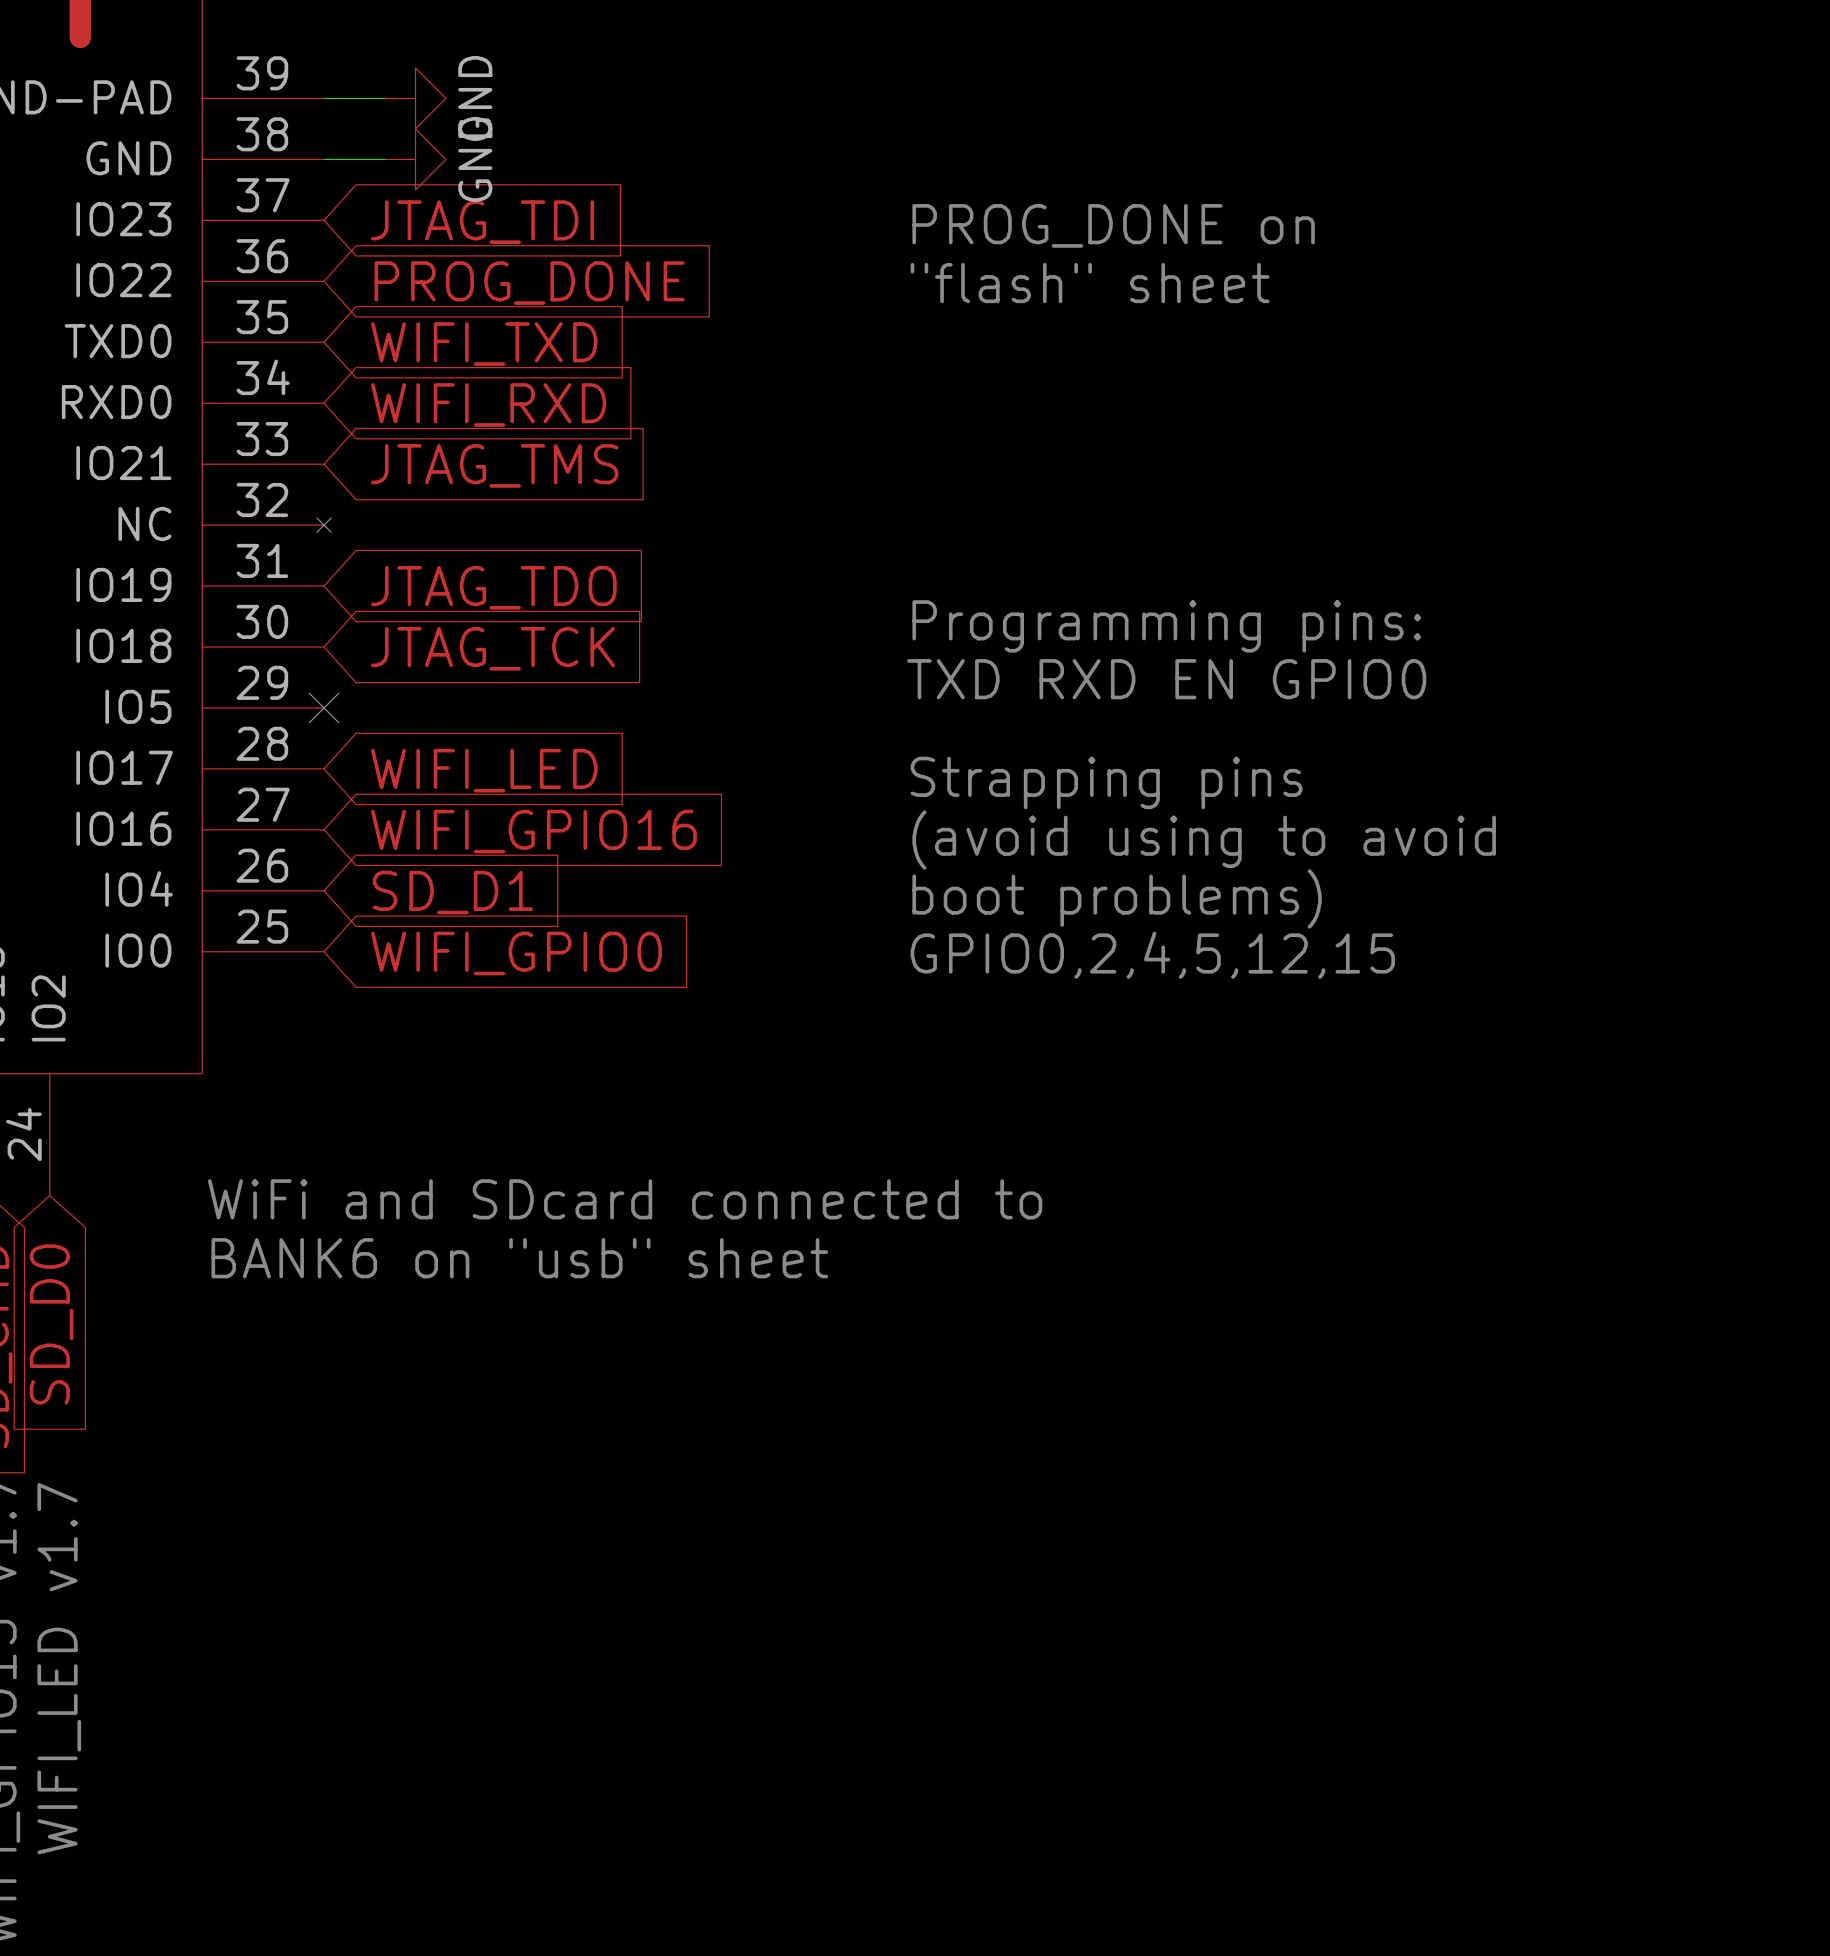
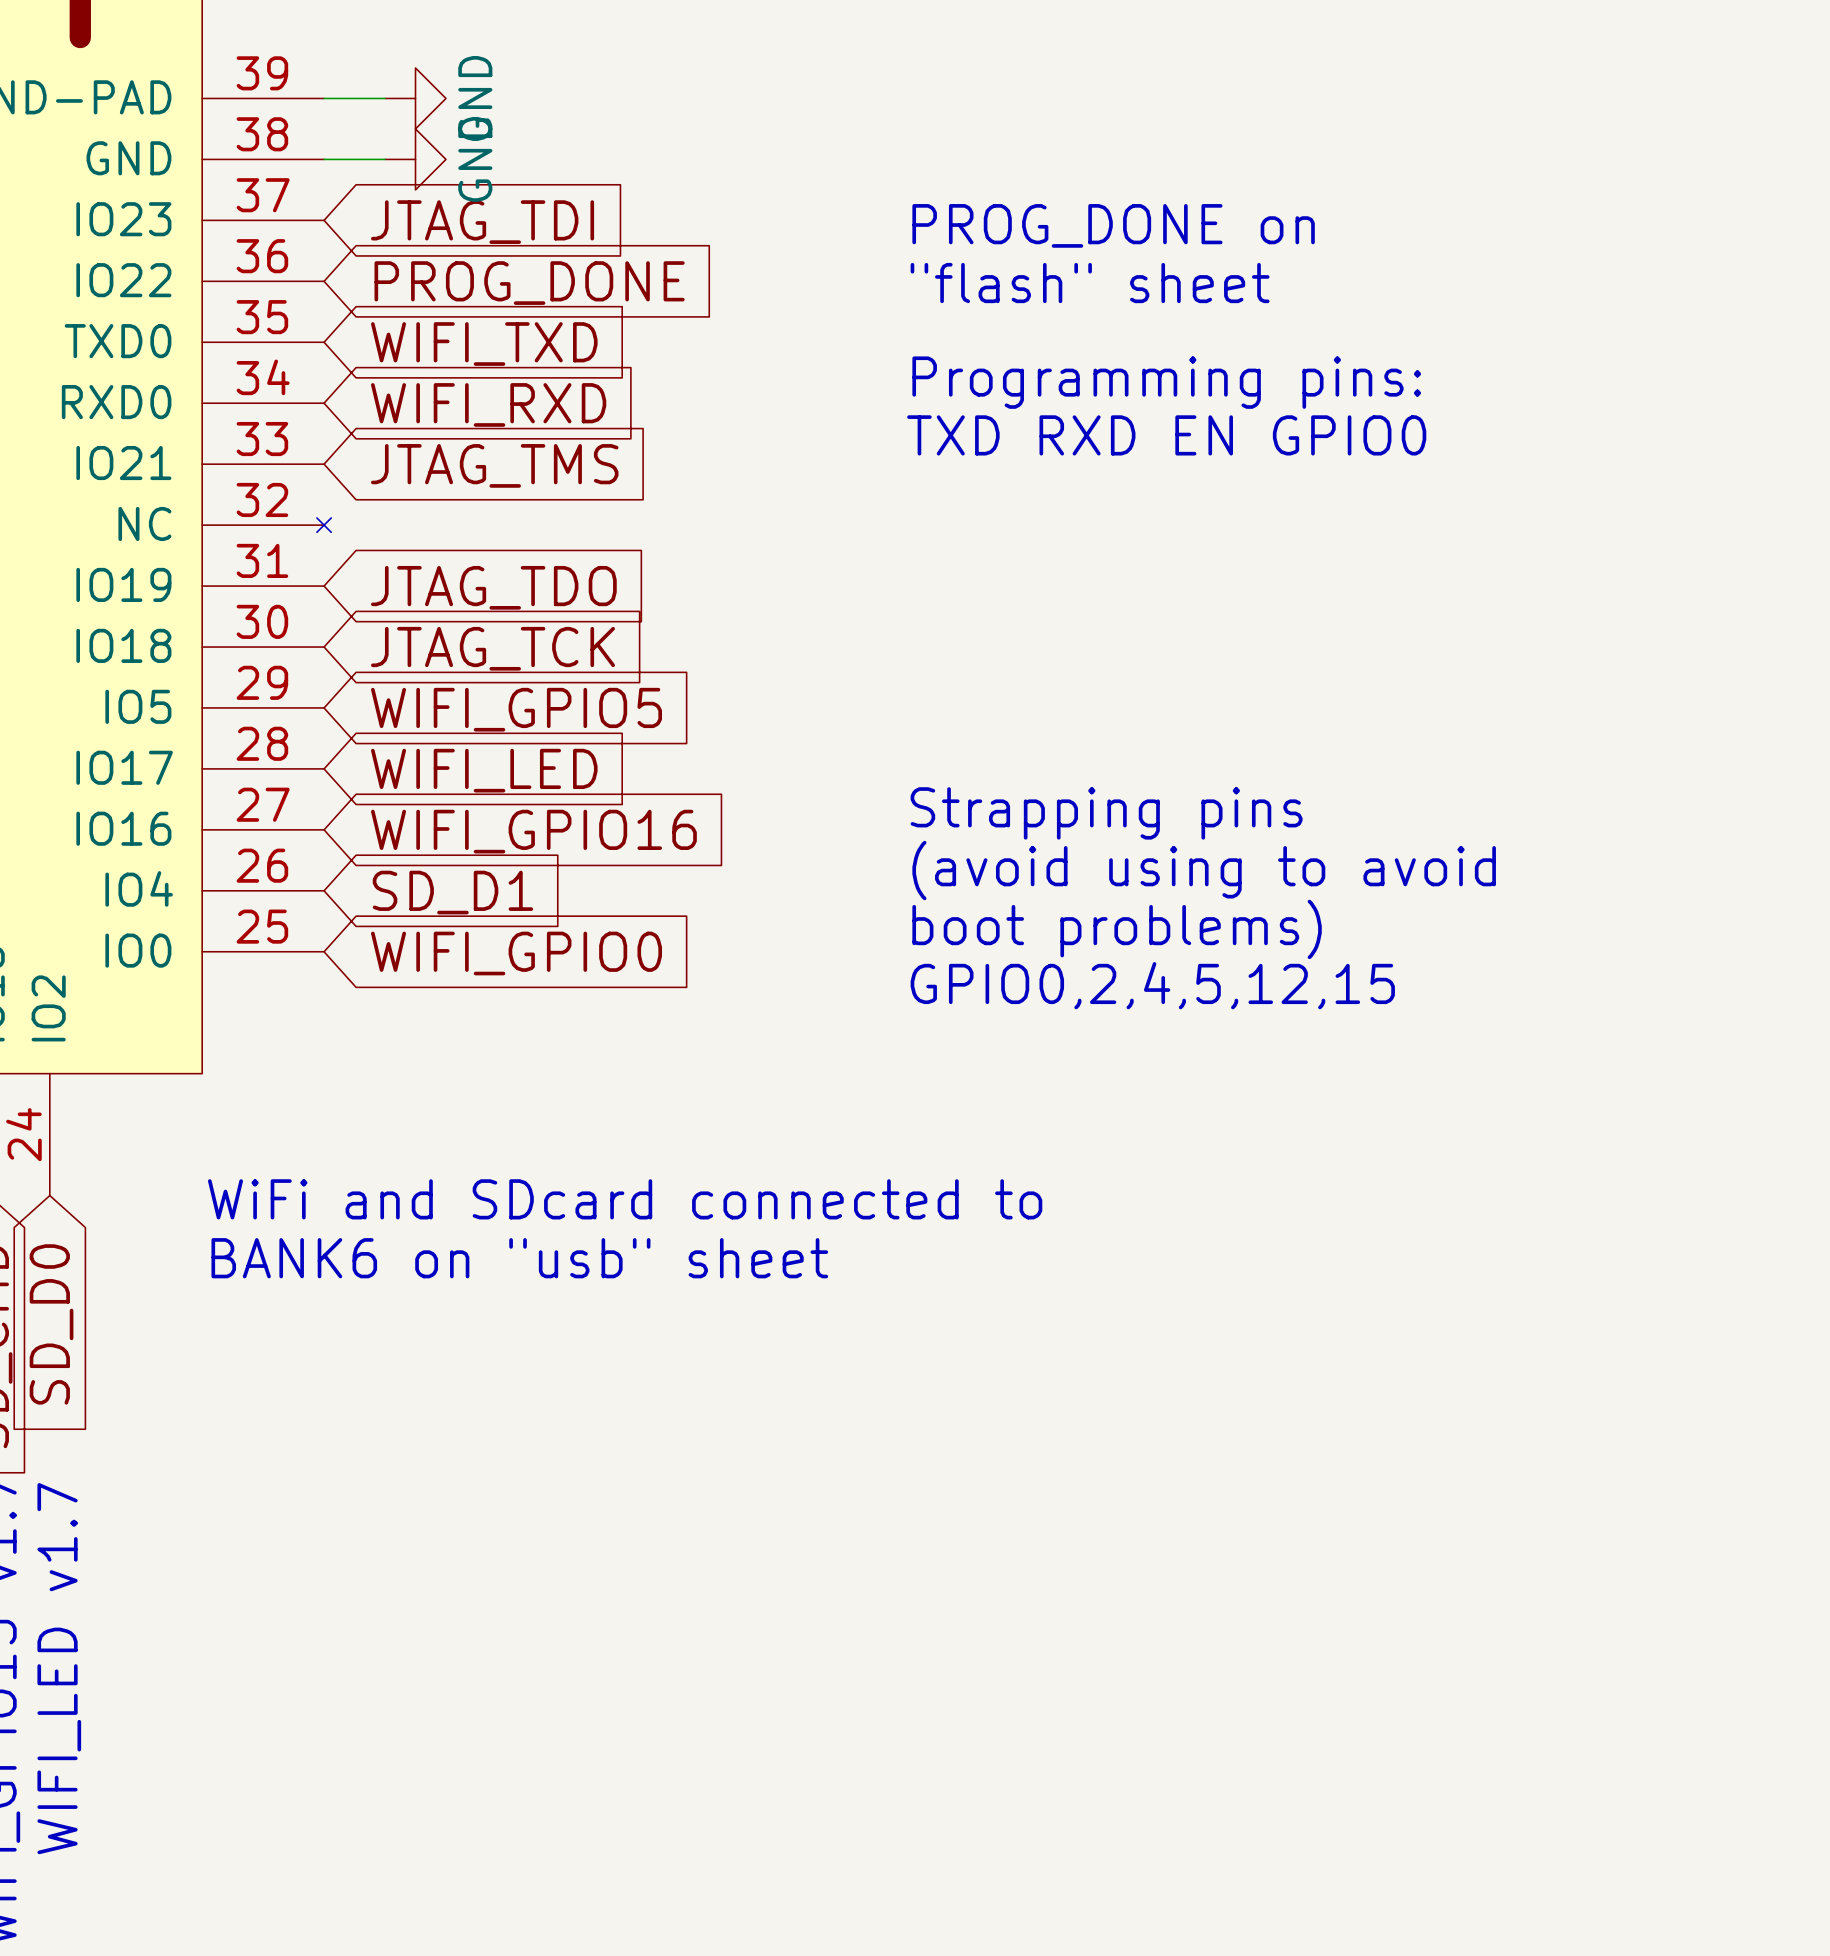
text position: Programming pins: (1166, 626) -> Programming pins: (1166, 382)
text position: TXD RXD EN GPIO0 (1166, 679) -> TXD RXD EN GPIO0 (1166, 435)
no-connect mark: (324, 707) -> none
global label: none -> WIFI_GPIO5 (516, 709)
text position: Strapping pins (1106, 782) -> Strapping pins (1106, 813)
text position: (avoid using to avoid (1204, 840) -> (avoid using to avoid (1204, 870)
text position: boot problems) (1117, 898) -> boot problems) (1117, 929)
text position: GPIO0,2,4,5,12,15 (1152, 955) -> GPIO0,2,4,5,12,15 (1152, 985)

